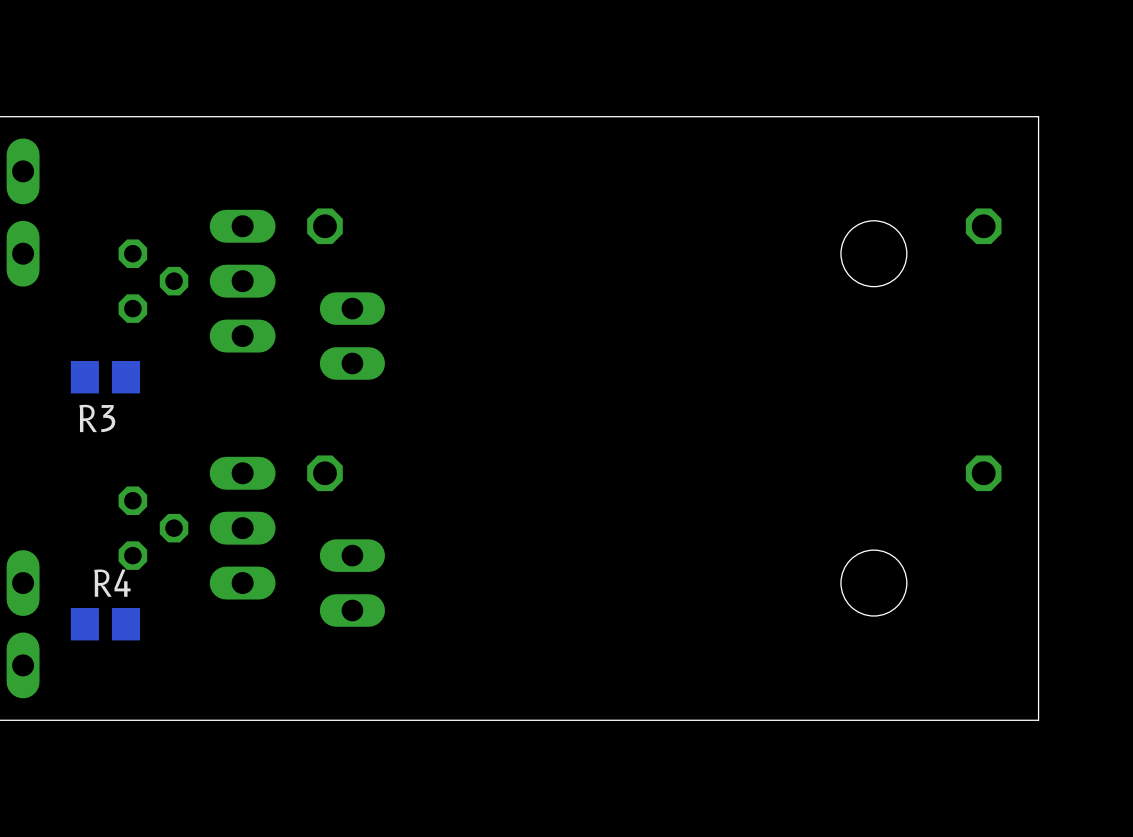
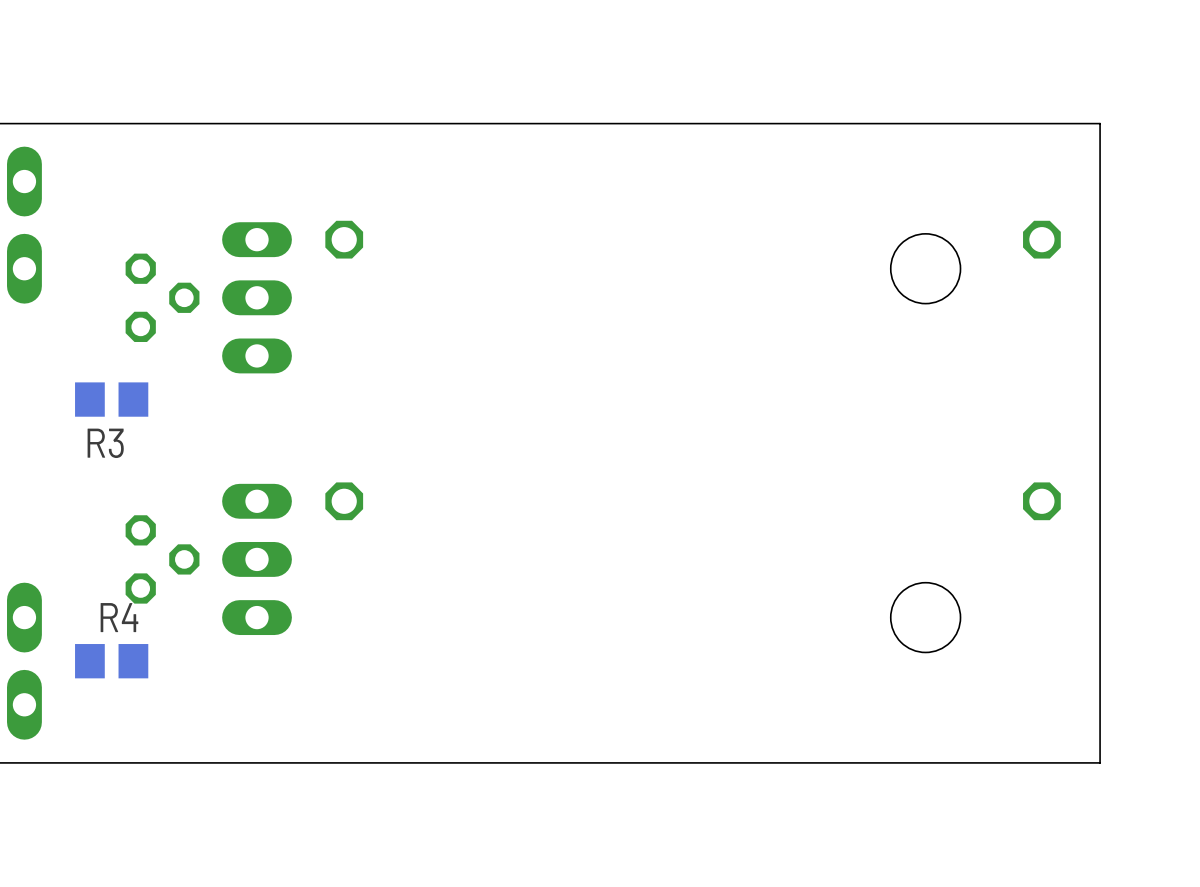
part: (352, 336) -> none
part: (352, 583) -> none

